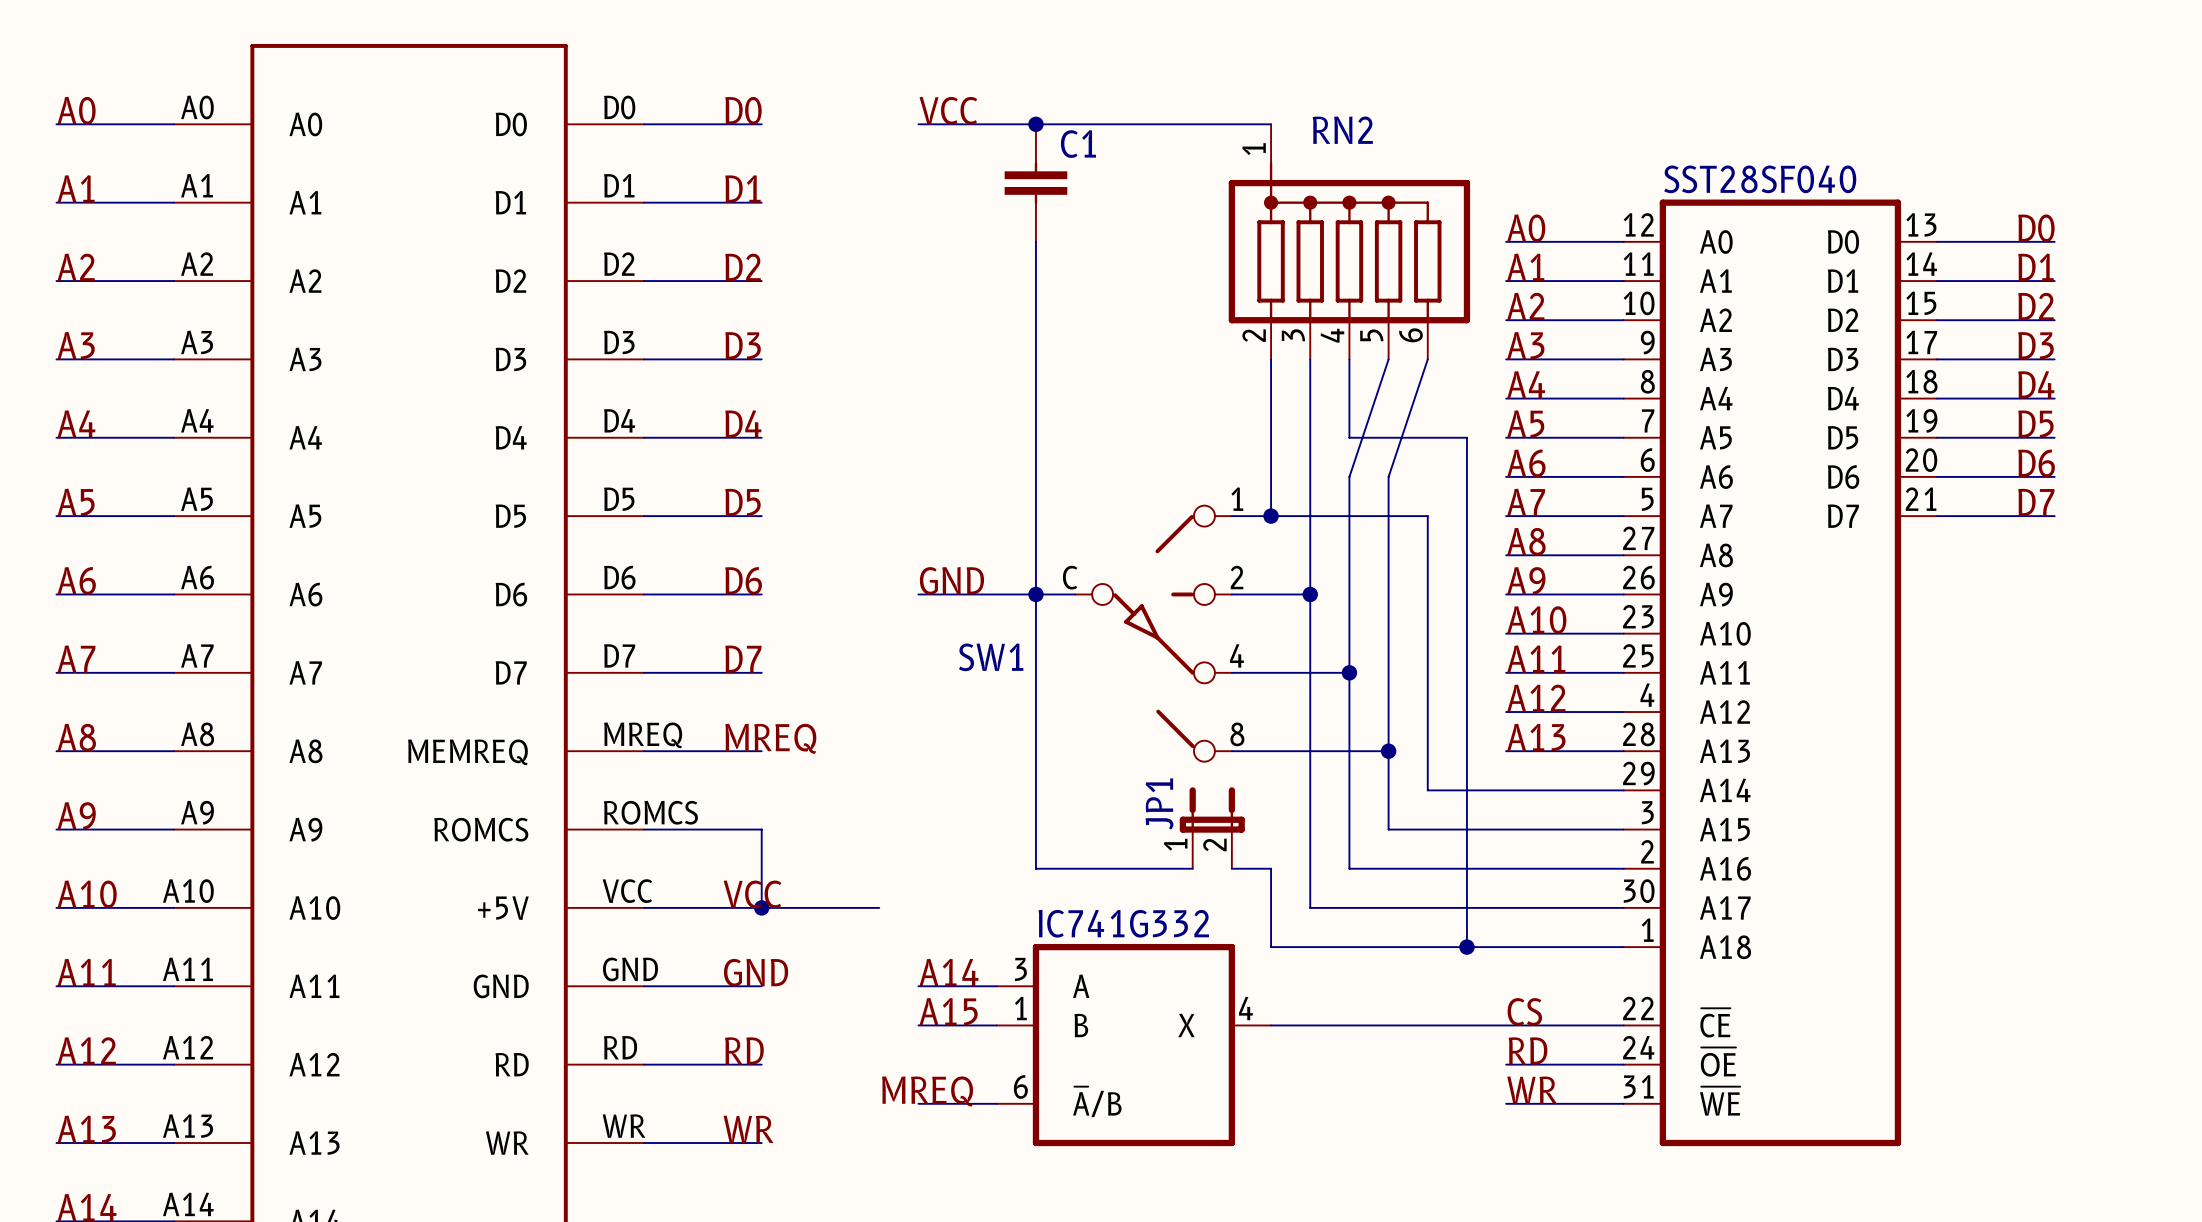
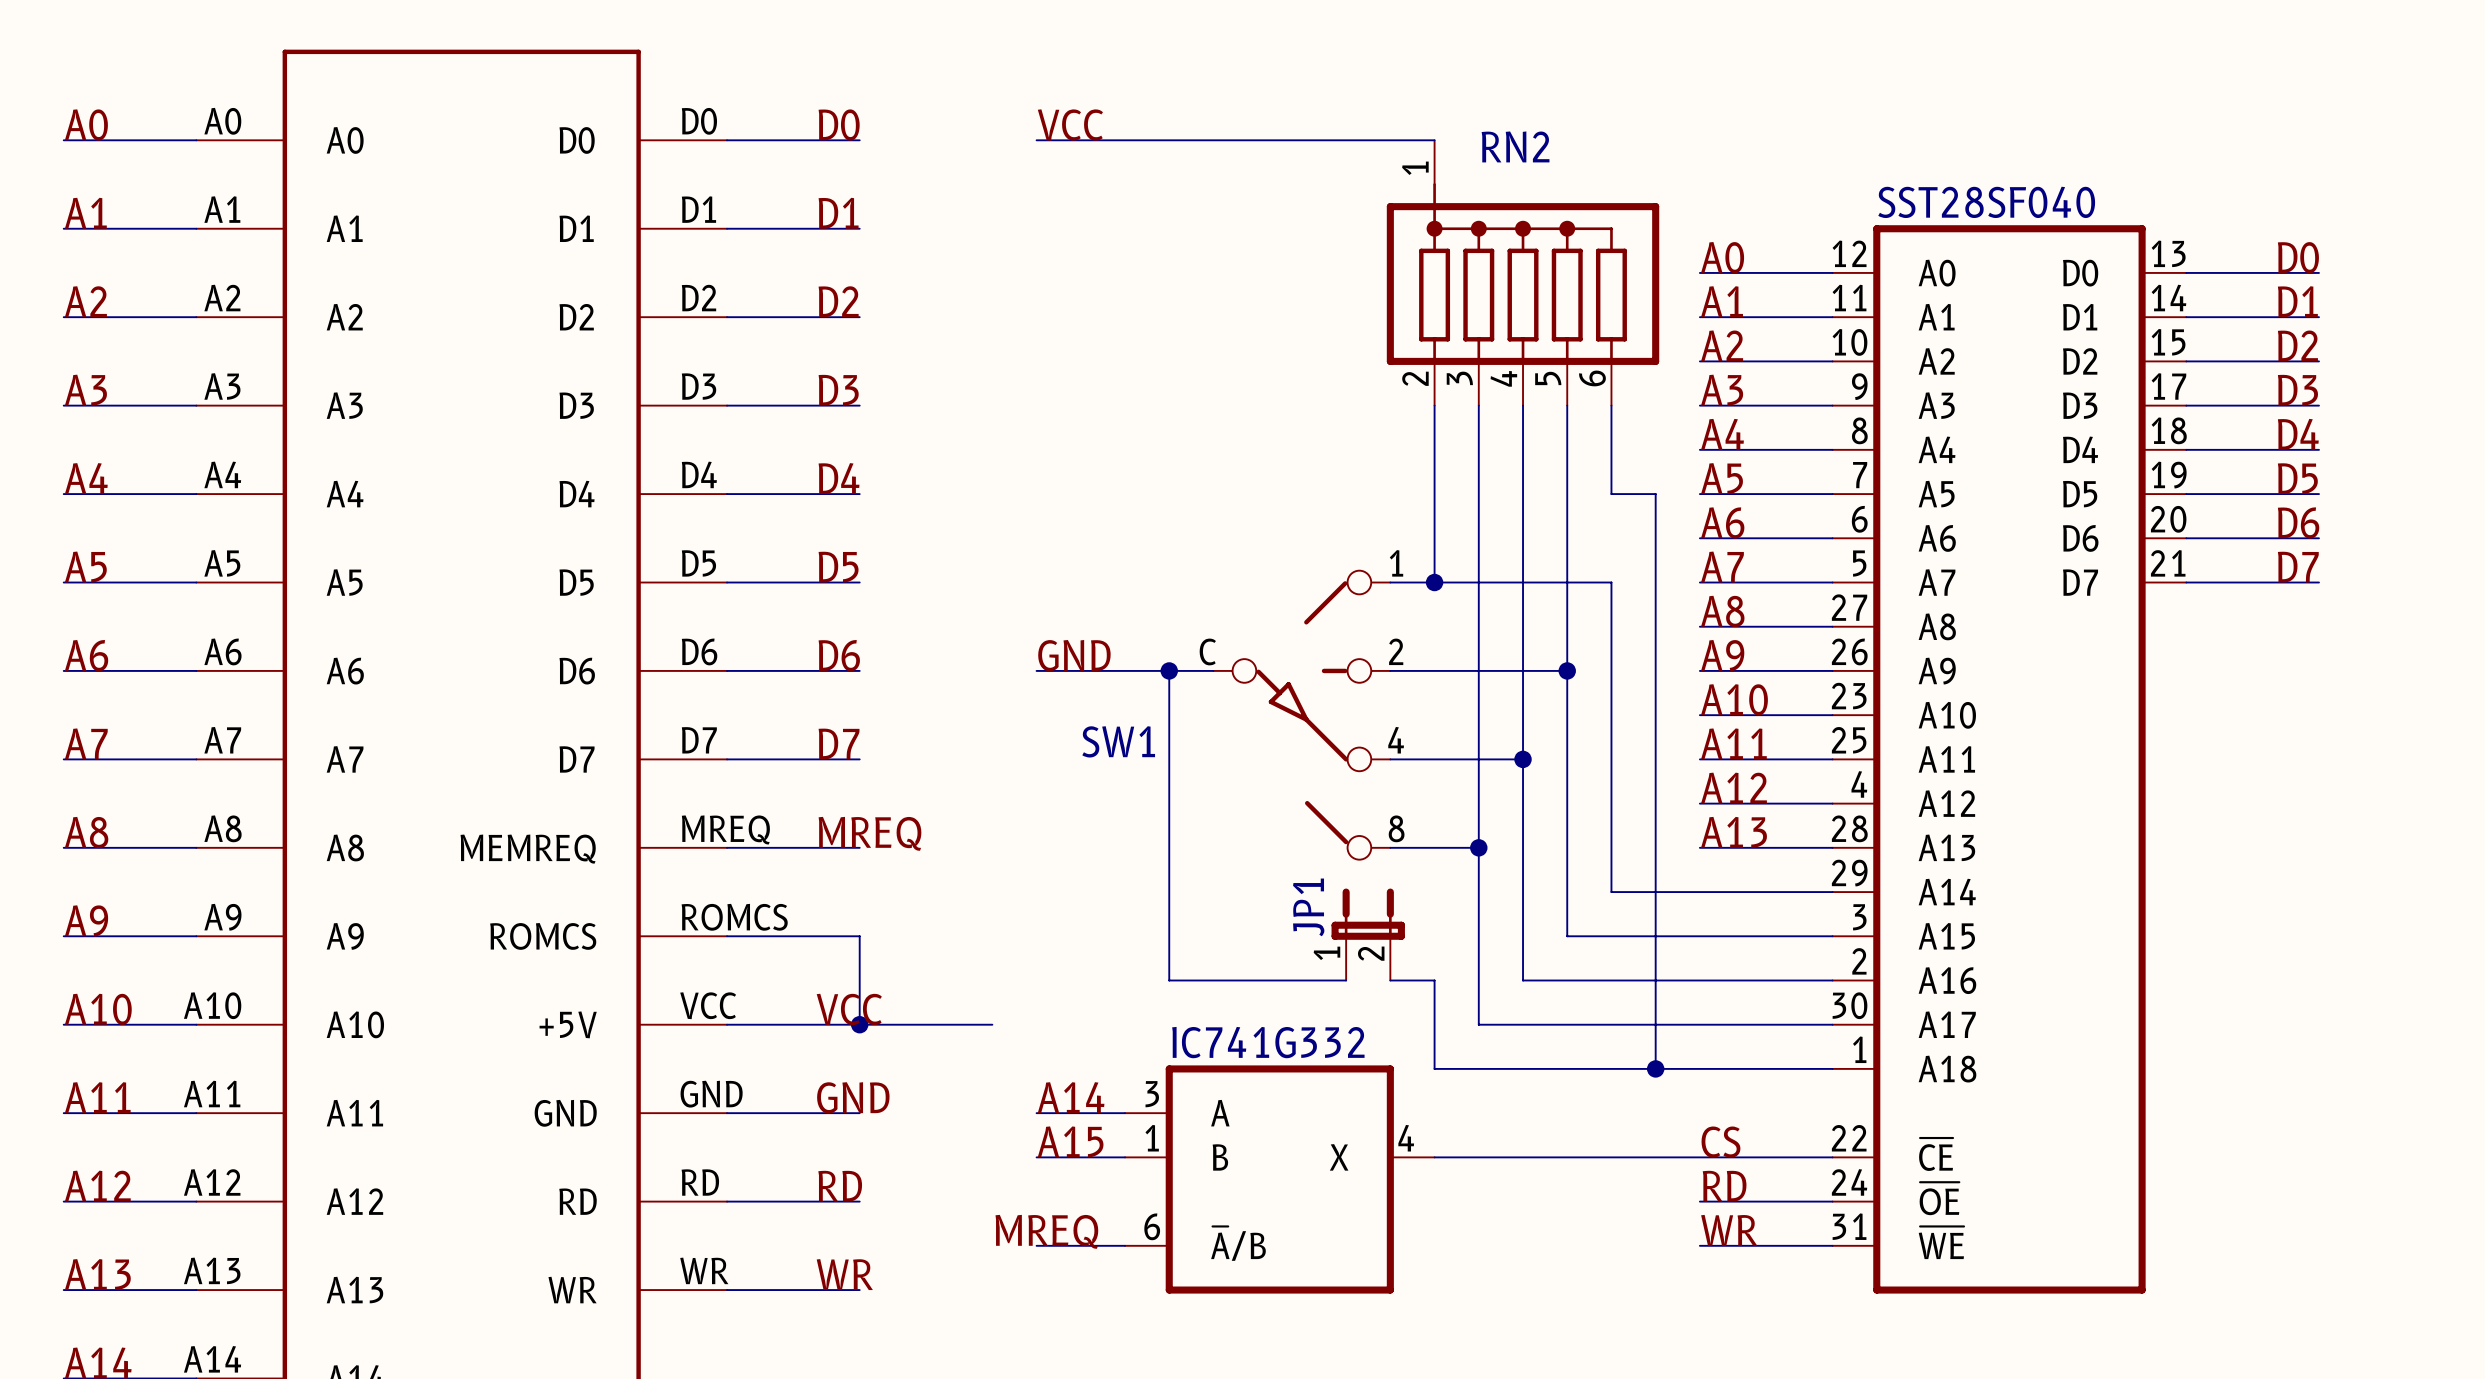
junction: (1035, 124) -> none
C1: (1035, 183) -> none
wire: (1035, 241) (1035, 594) -> none
wire: (1388, 359) (1349, 476) -> none
wire: (1427, 359) (1388, 476) -> (1567, 405) (1567, 538)
wire: none -> (1611, 405) (1611, 494)
wire: (1349, 437) (1427, 437) -> (1523, 494) (1523, 538)
junction: (1310, 594) -> none
junction: none -> (1567, 670)
wire: (1310, 751) (1388, 751) -> (1478, 670) (1567, 670)
junction: none -> (1478, 847)
junction: (1388, 751) -> none

